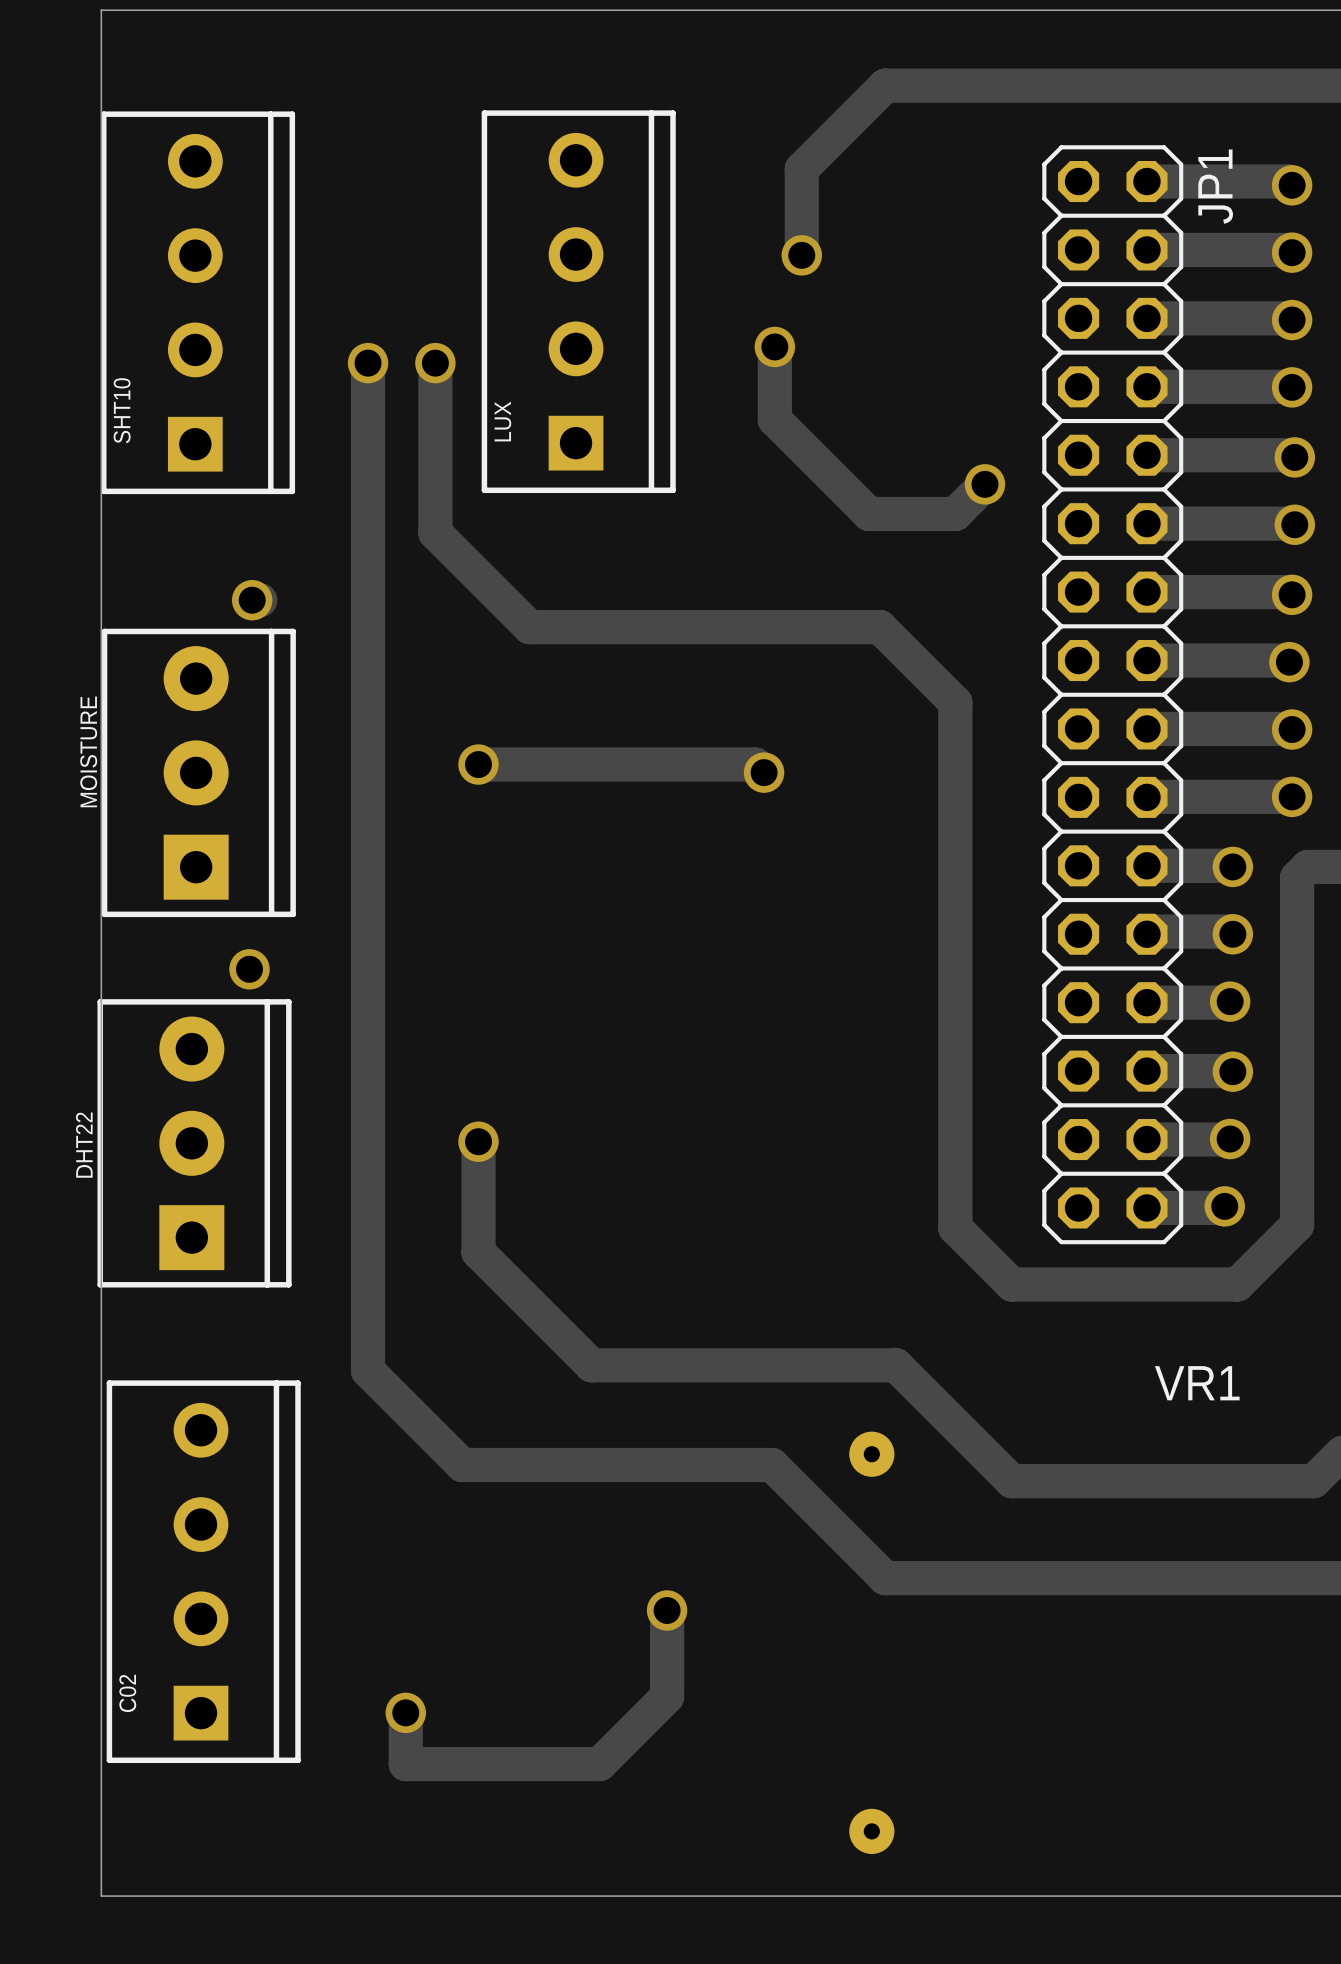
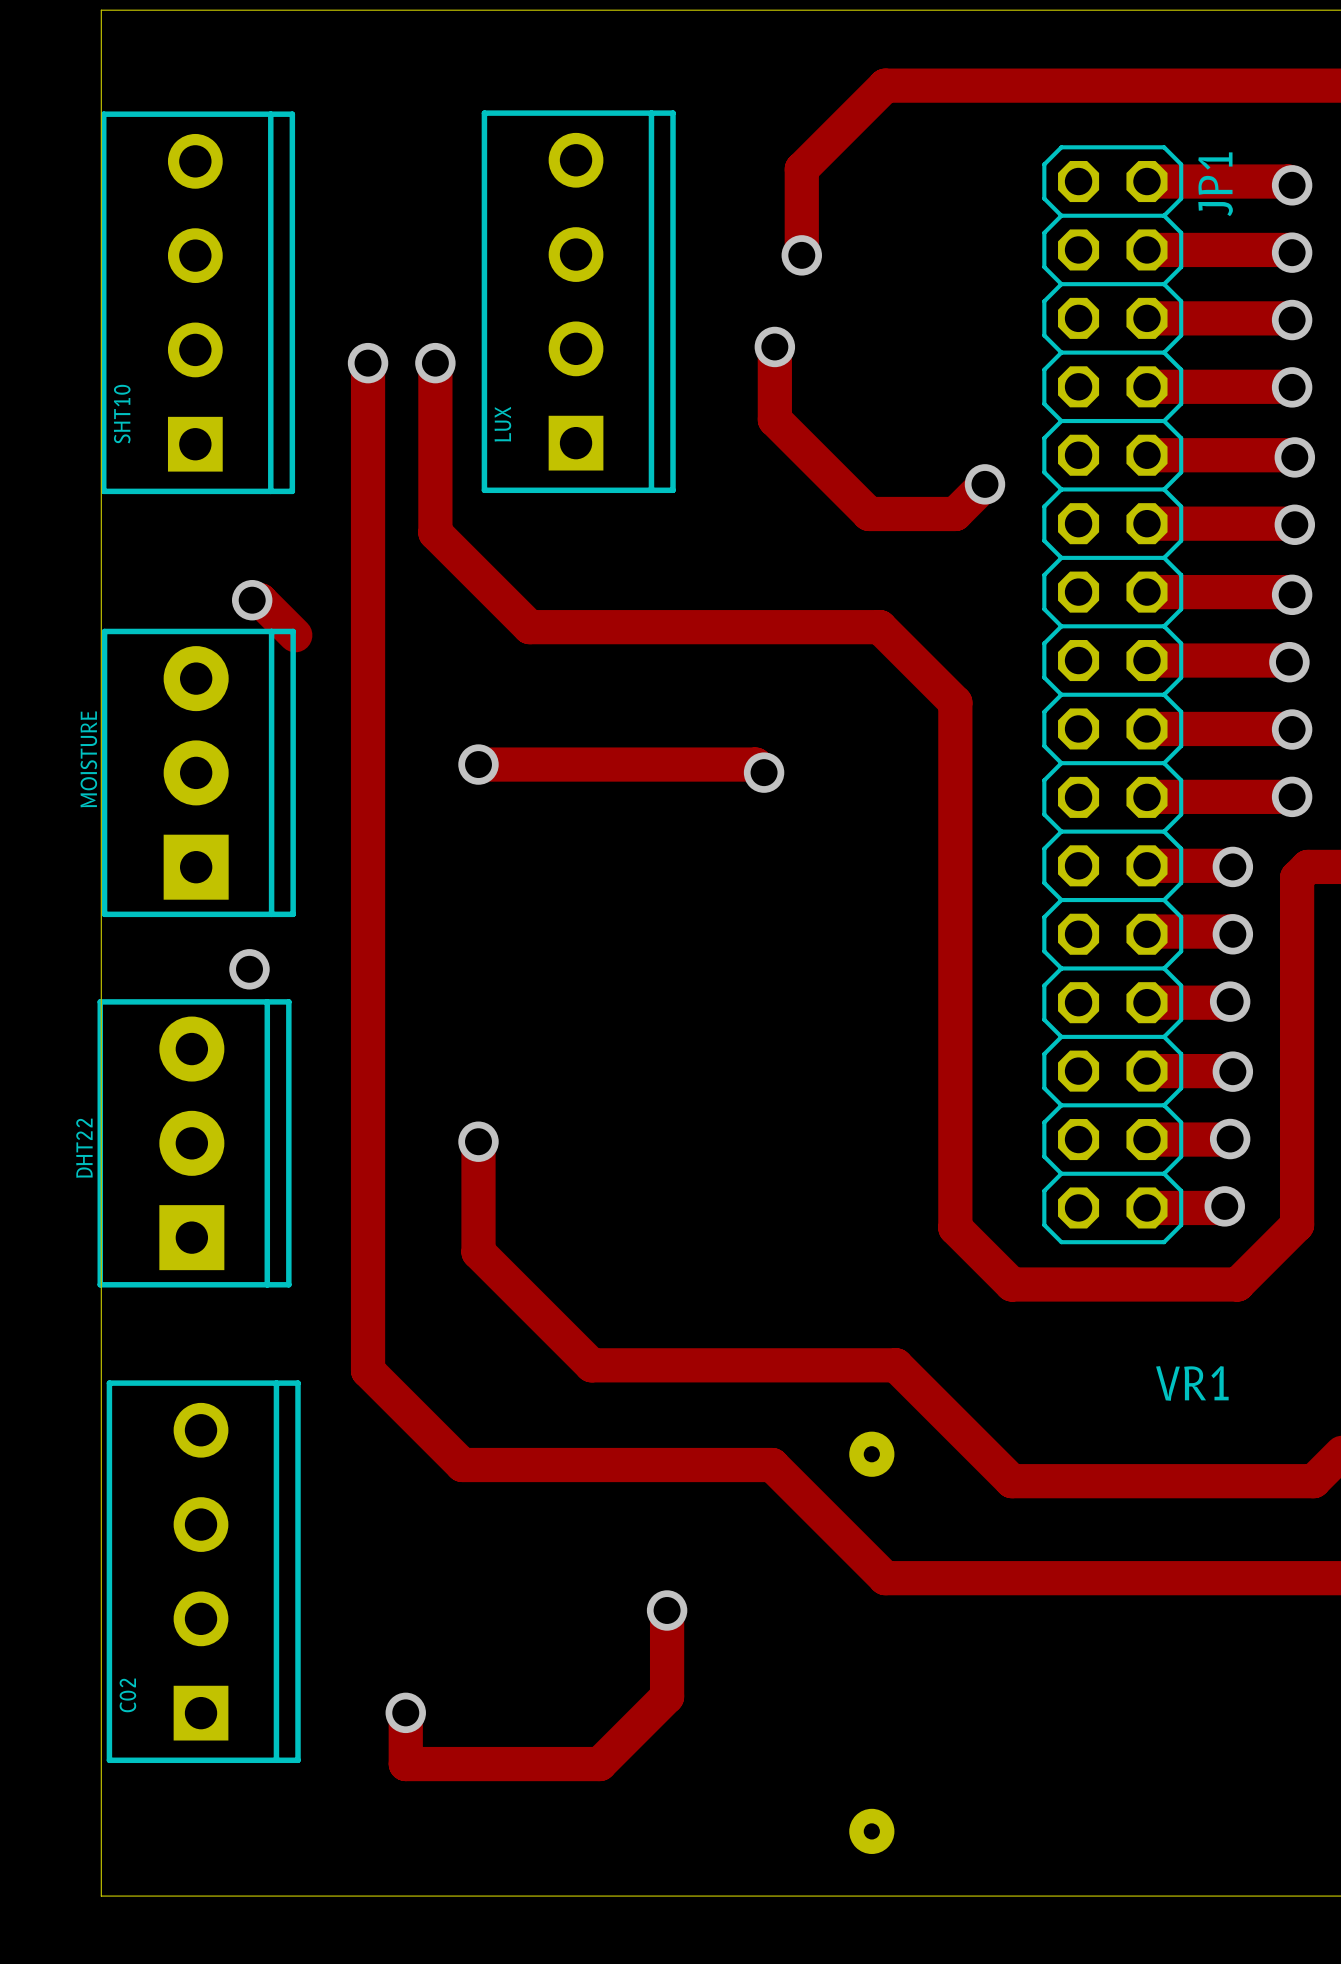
track: none -> (260, 600) (295, 635)

